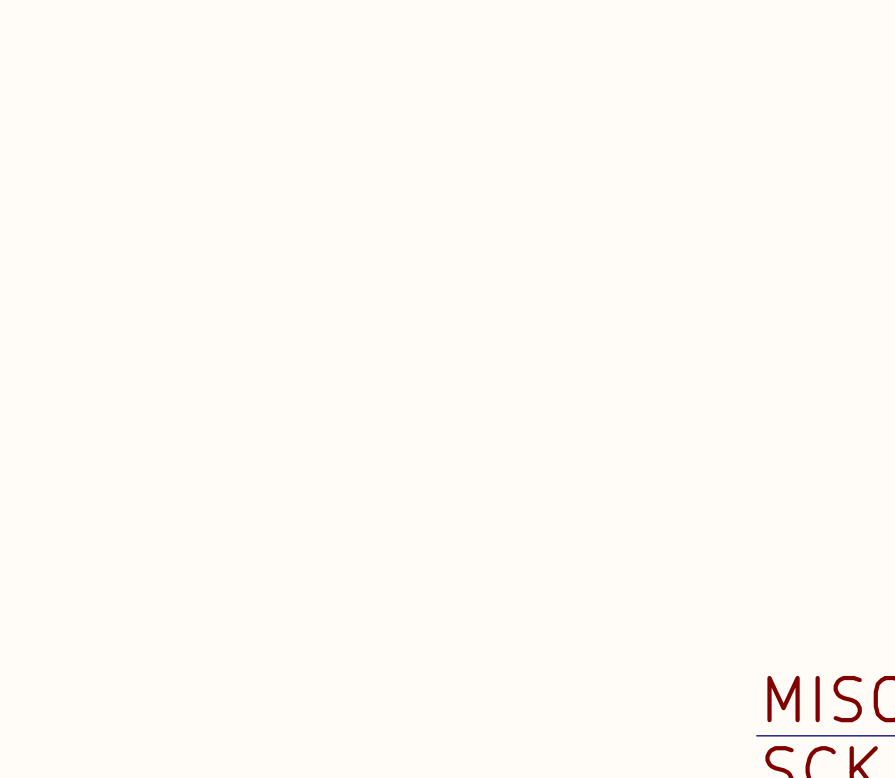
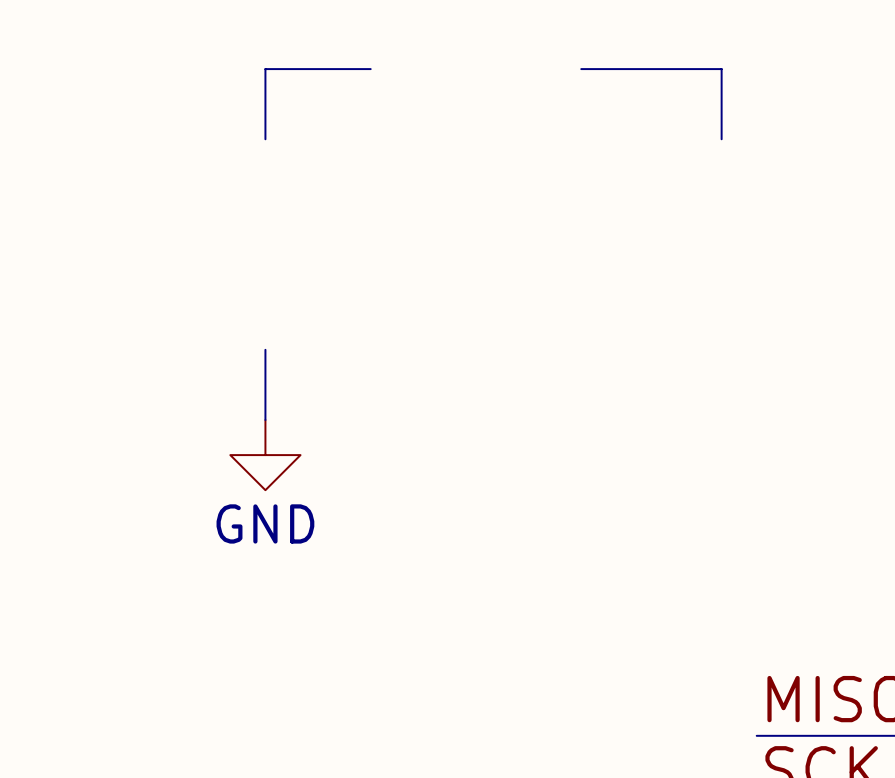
wire: none -> (370, 69) (265, 69) (265, 139)
wire: none -> (581, 69) (721, 69) (721, 139)
wire: none -> (265, 349) (265, 420)
power symbol: none -> GND (265, 455)

